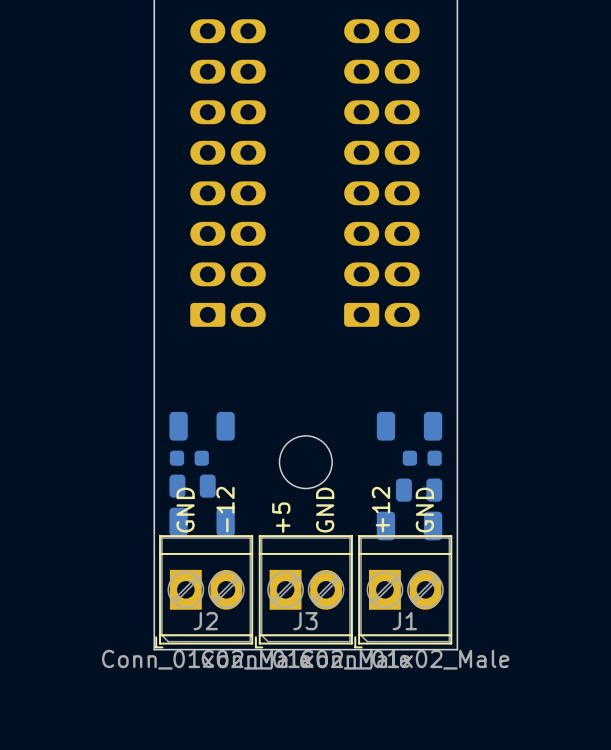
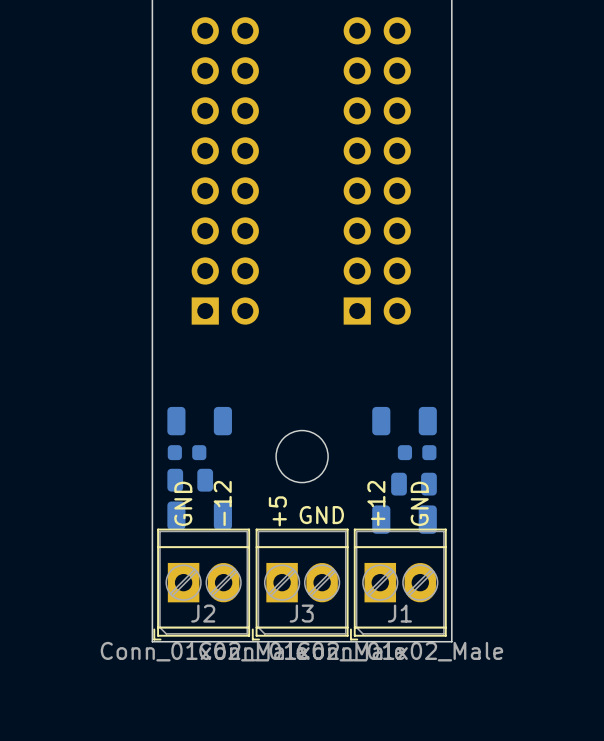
part footprint: [190, 19, 266, 327] -> [191, 17, 259, 325]
part footprint: [344, 19, 420, 327] -> [343, 17, 411, 325]
text rotation: 0° (325, 510) -> 90° clockwise (321, 515)

